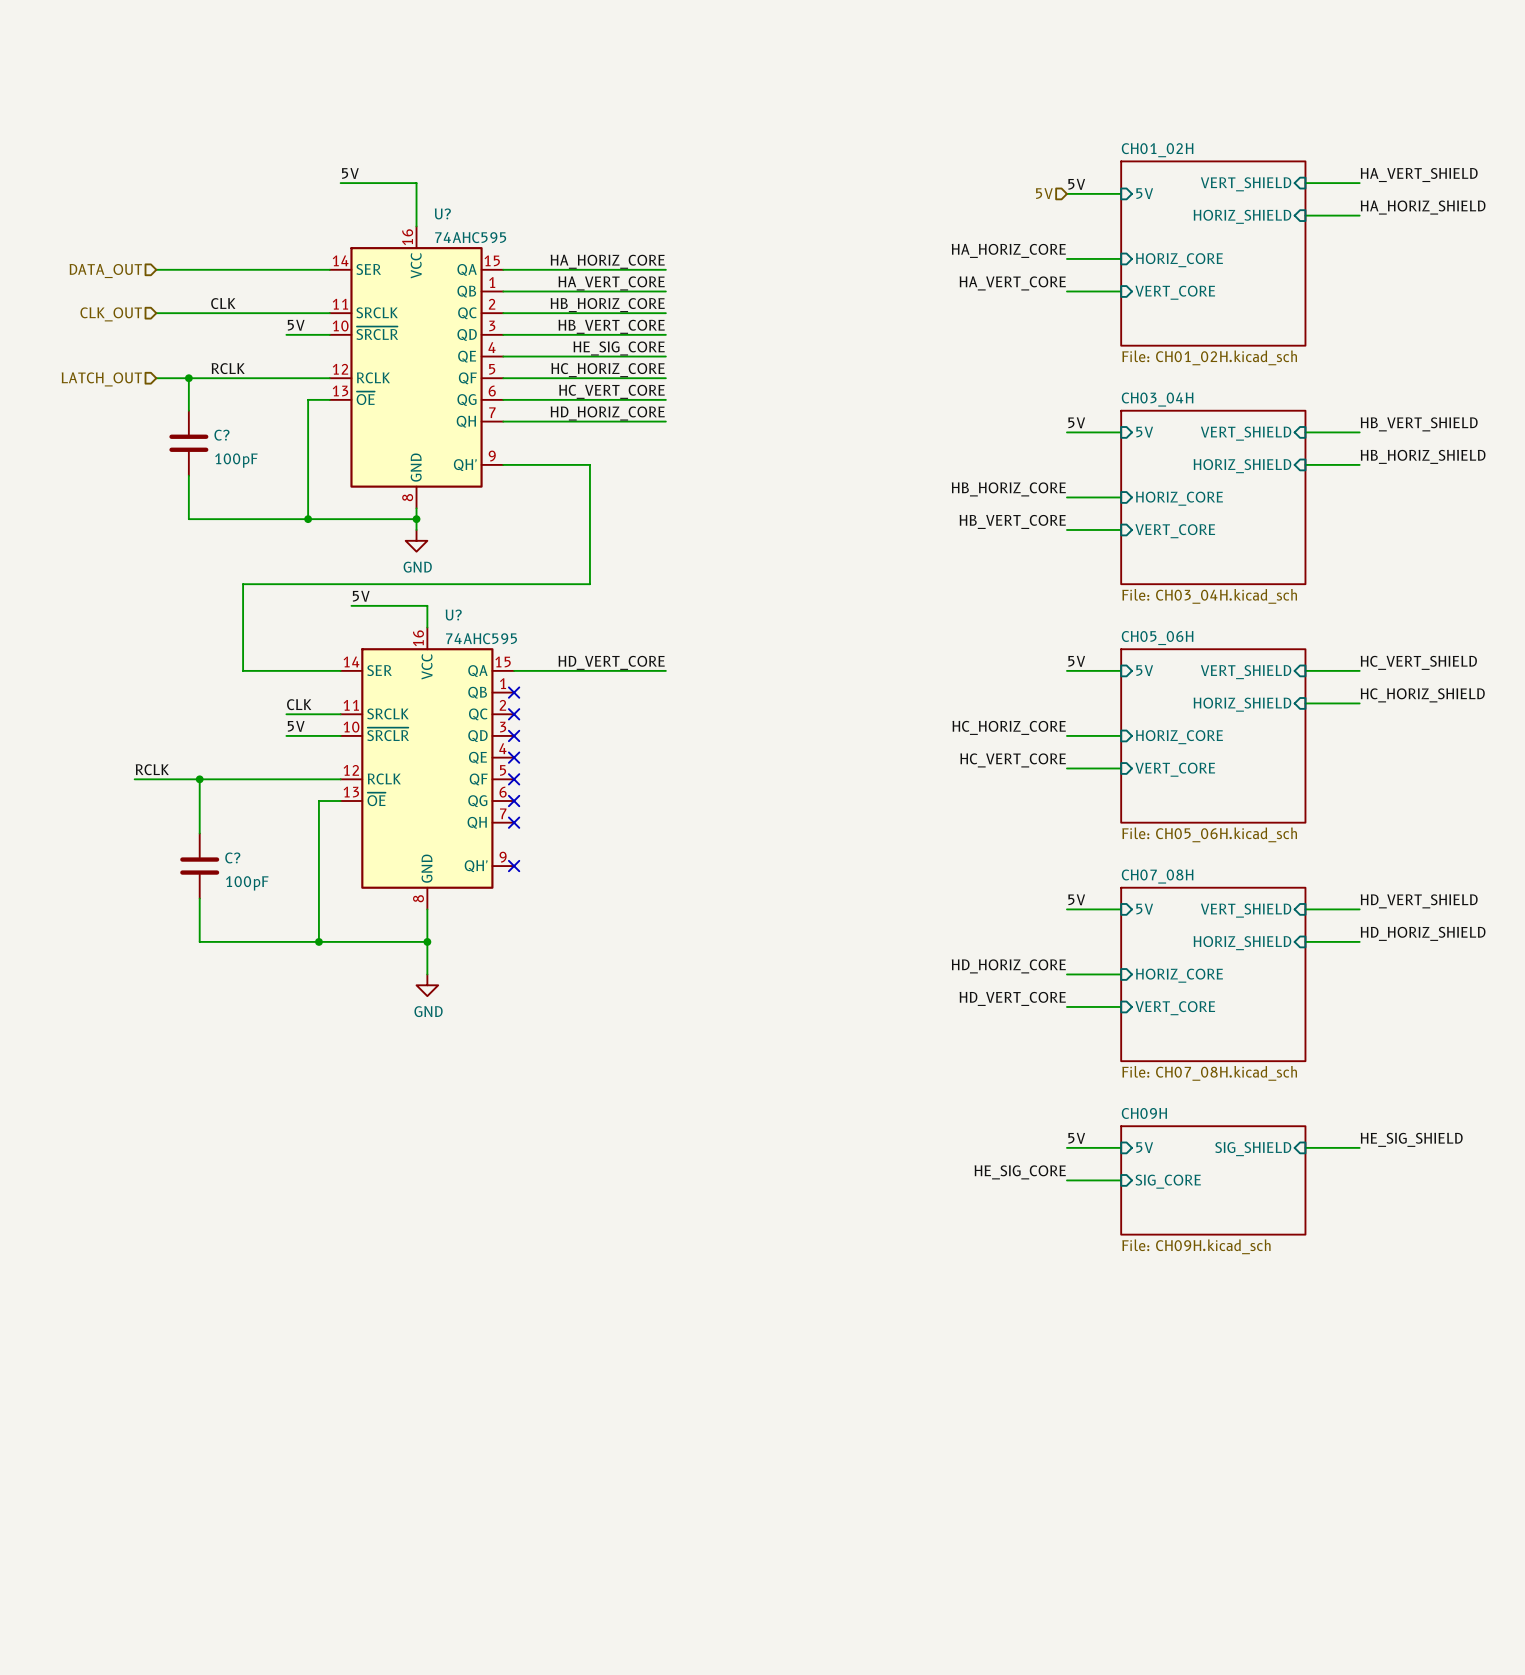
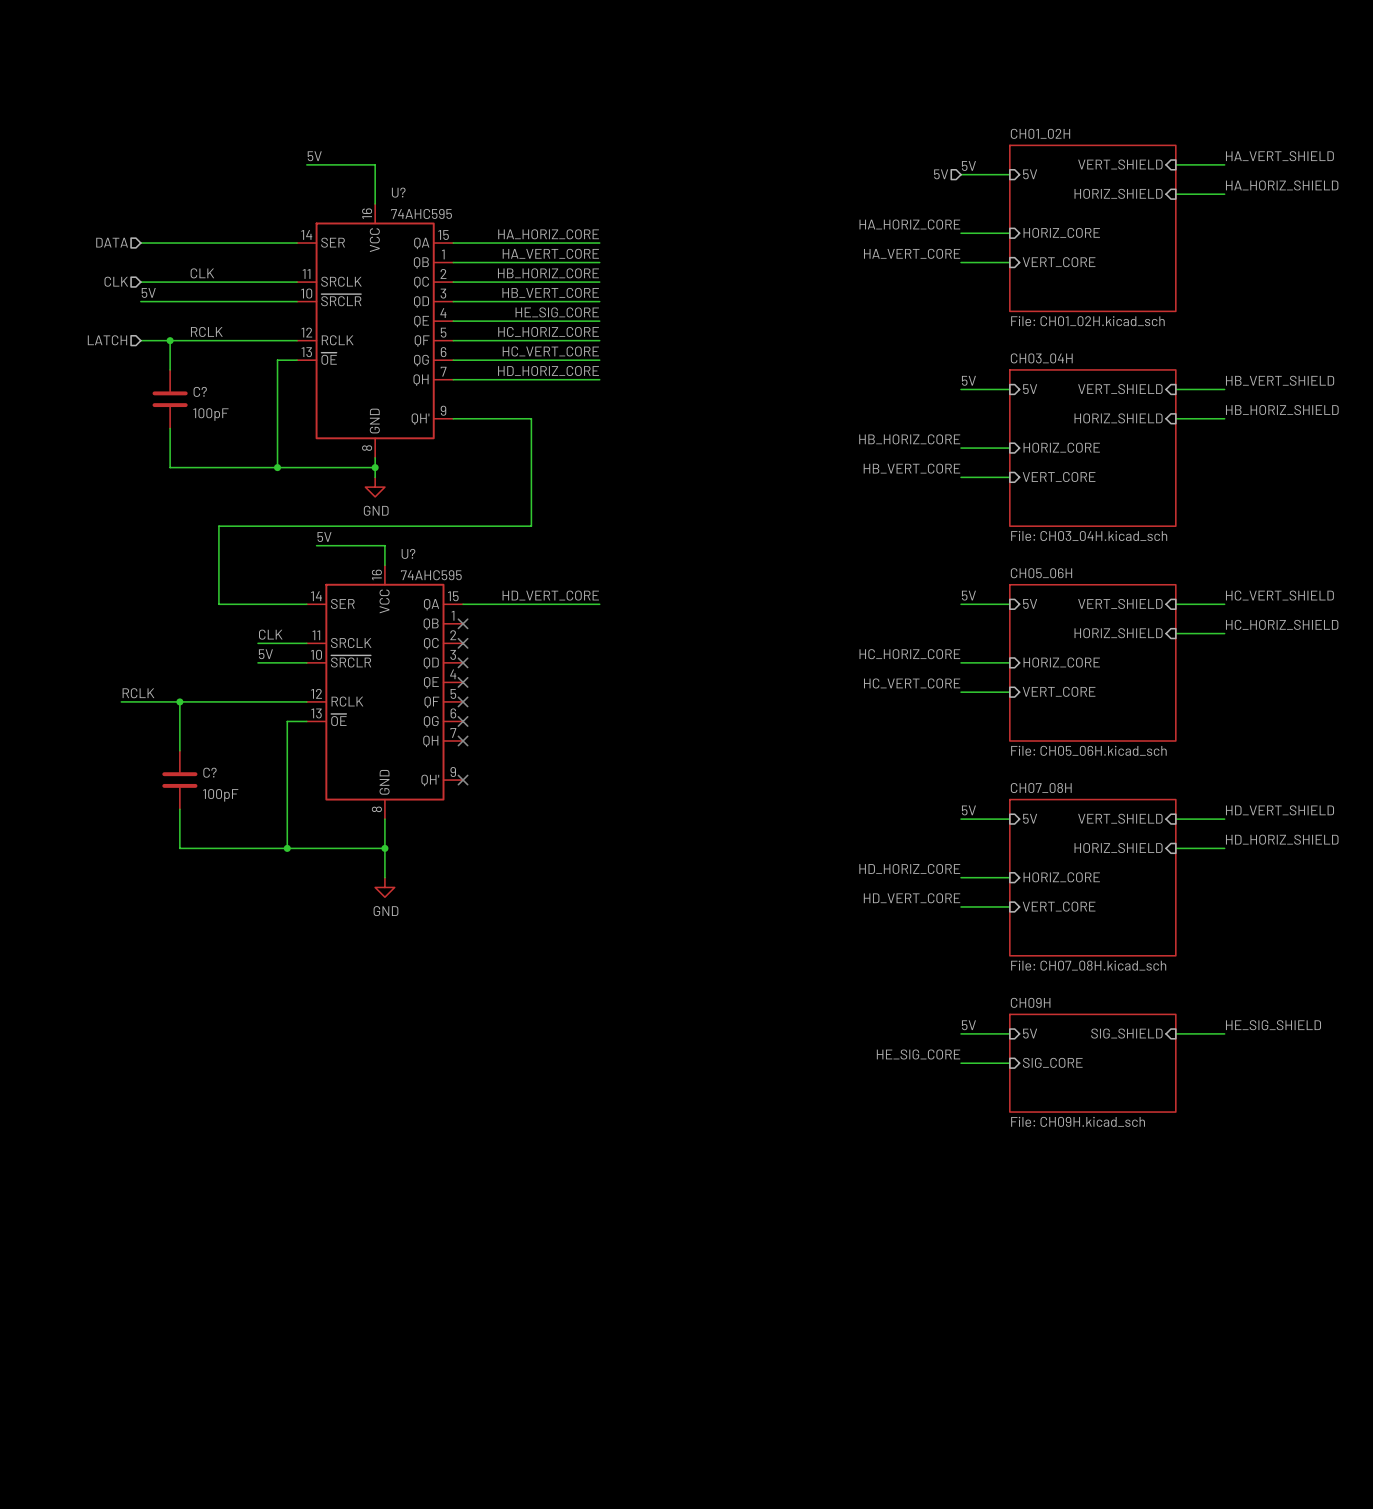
hierarchical label: DATA_OUT (105, 271) -> DATA (112, 242)
hierarchical label: CLK_OUT (111, 314) -> CLK (116, 281)
label position: 5V (296, 325) -> 5V (148, 292)
wire: none -> (140, 301) (257, 301)
hierarchical label: LATCH_OUT (101, 379) -> LATCH (107, 340)

